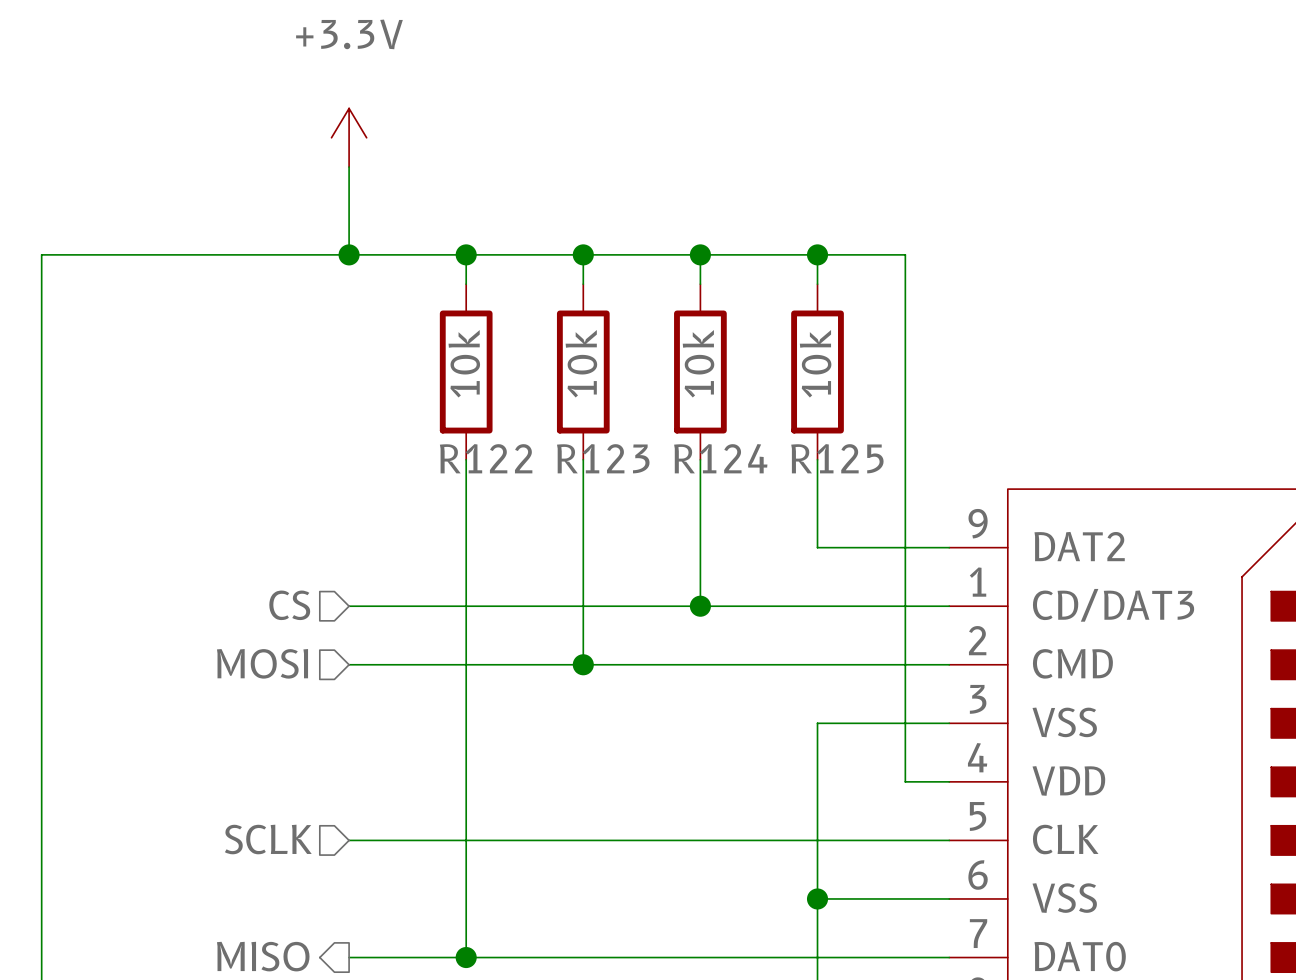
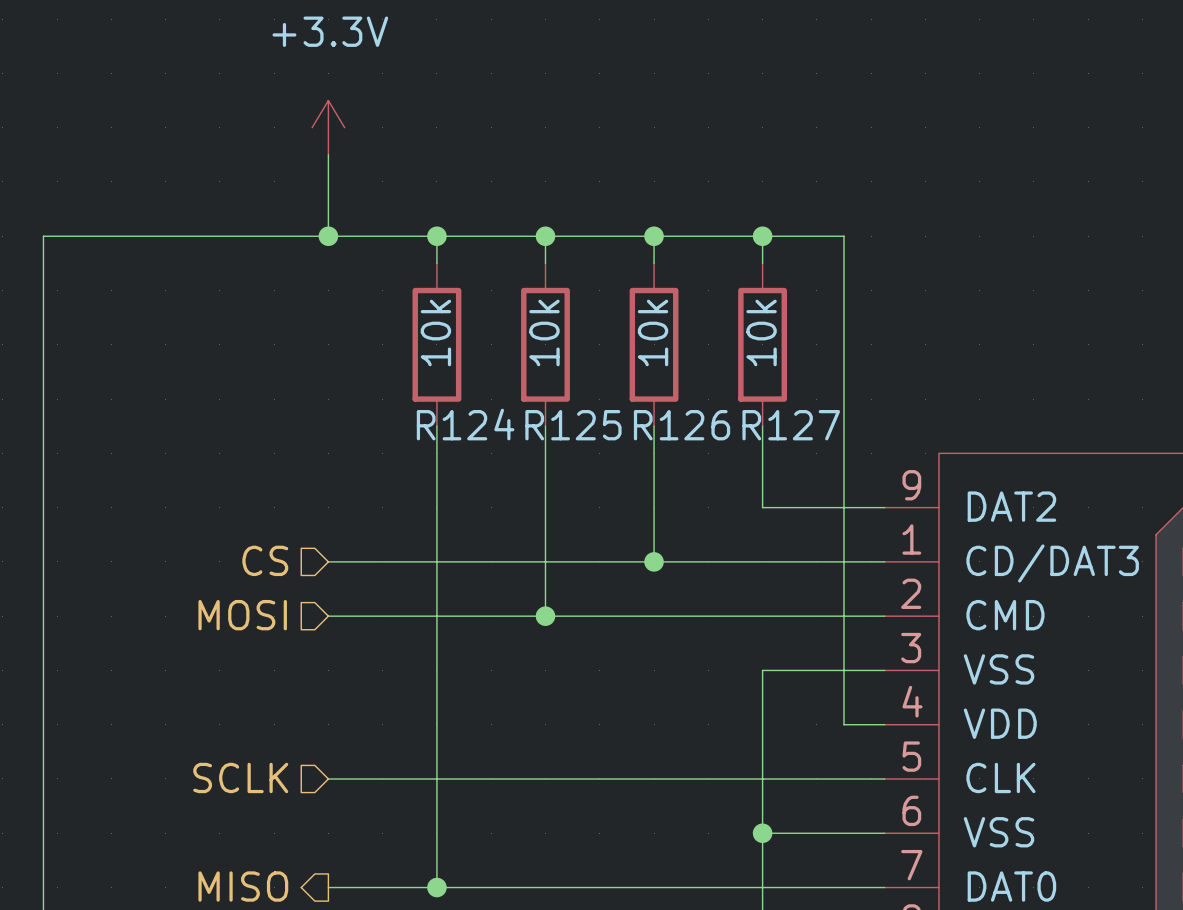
R122 name: R122 (486, 458) -> R124 (465, 424)
R123 name: R123 (603, 458) -> R125 (573, 425)
R124 name: R124 (720, 458) -> R126 (682, 425)
R125 name: R125 (837, 458) -> R127 (791, 425)

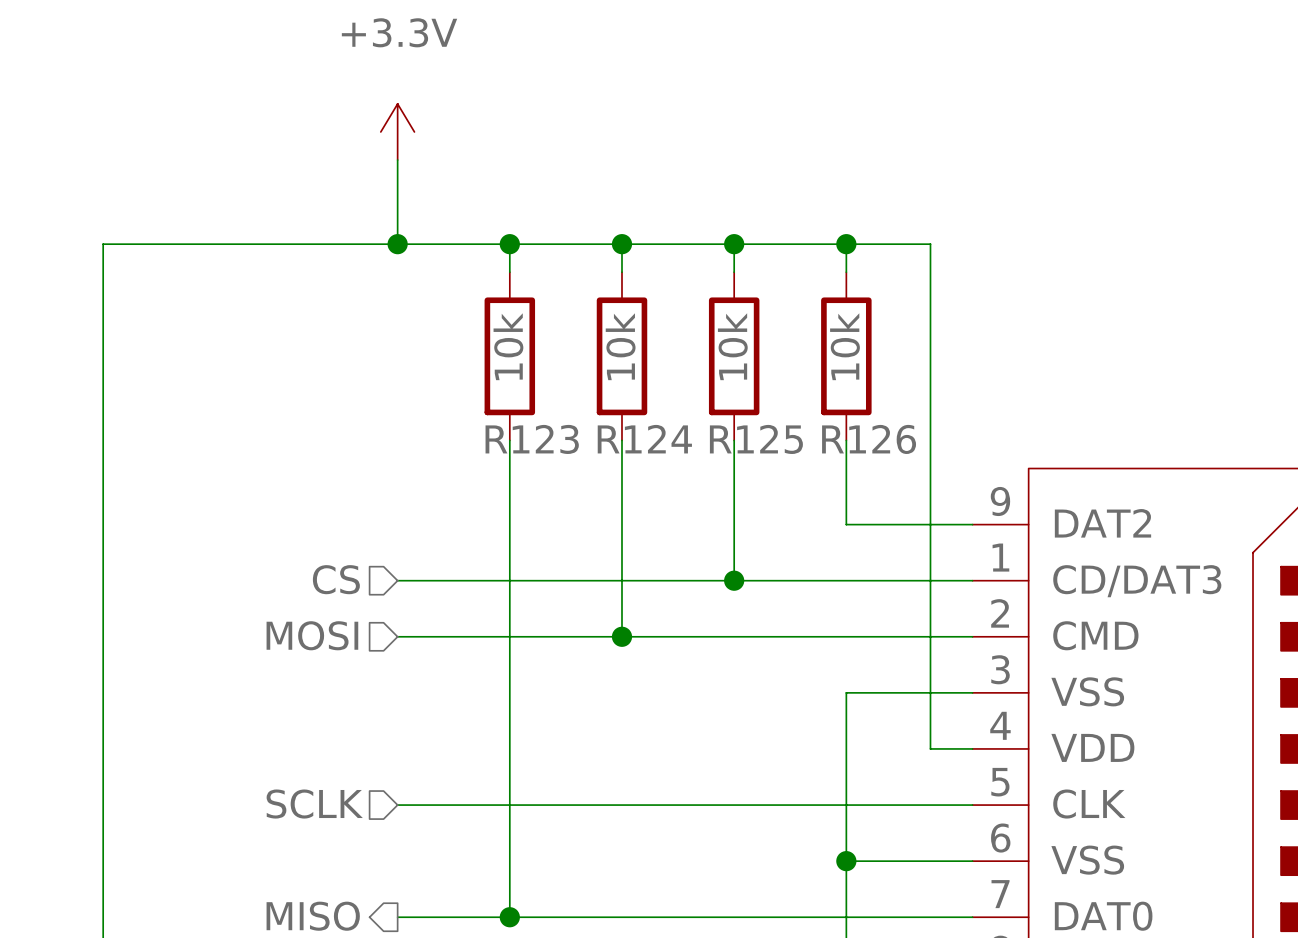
R124 name: R124 (465, 424) -> R123 (532, 439)
R125 name: R125 (573, 425) -> R124 (644, 439)
R126 name: R126 (682, 425) -> R125 (756, 439)
R127 name: R127 (791, 425) -> R126 (869, 439)

